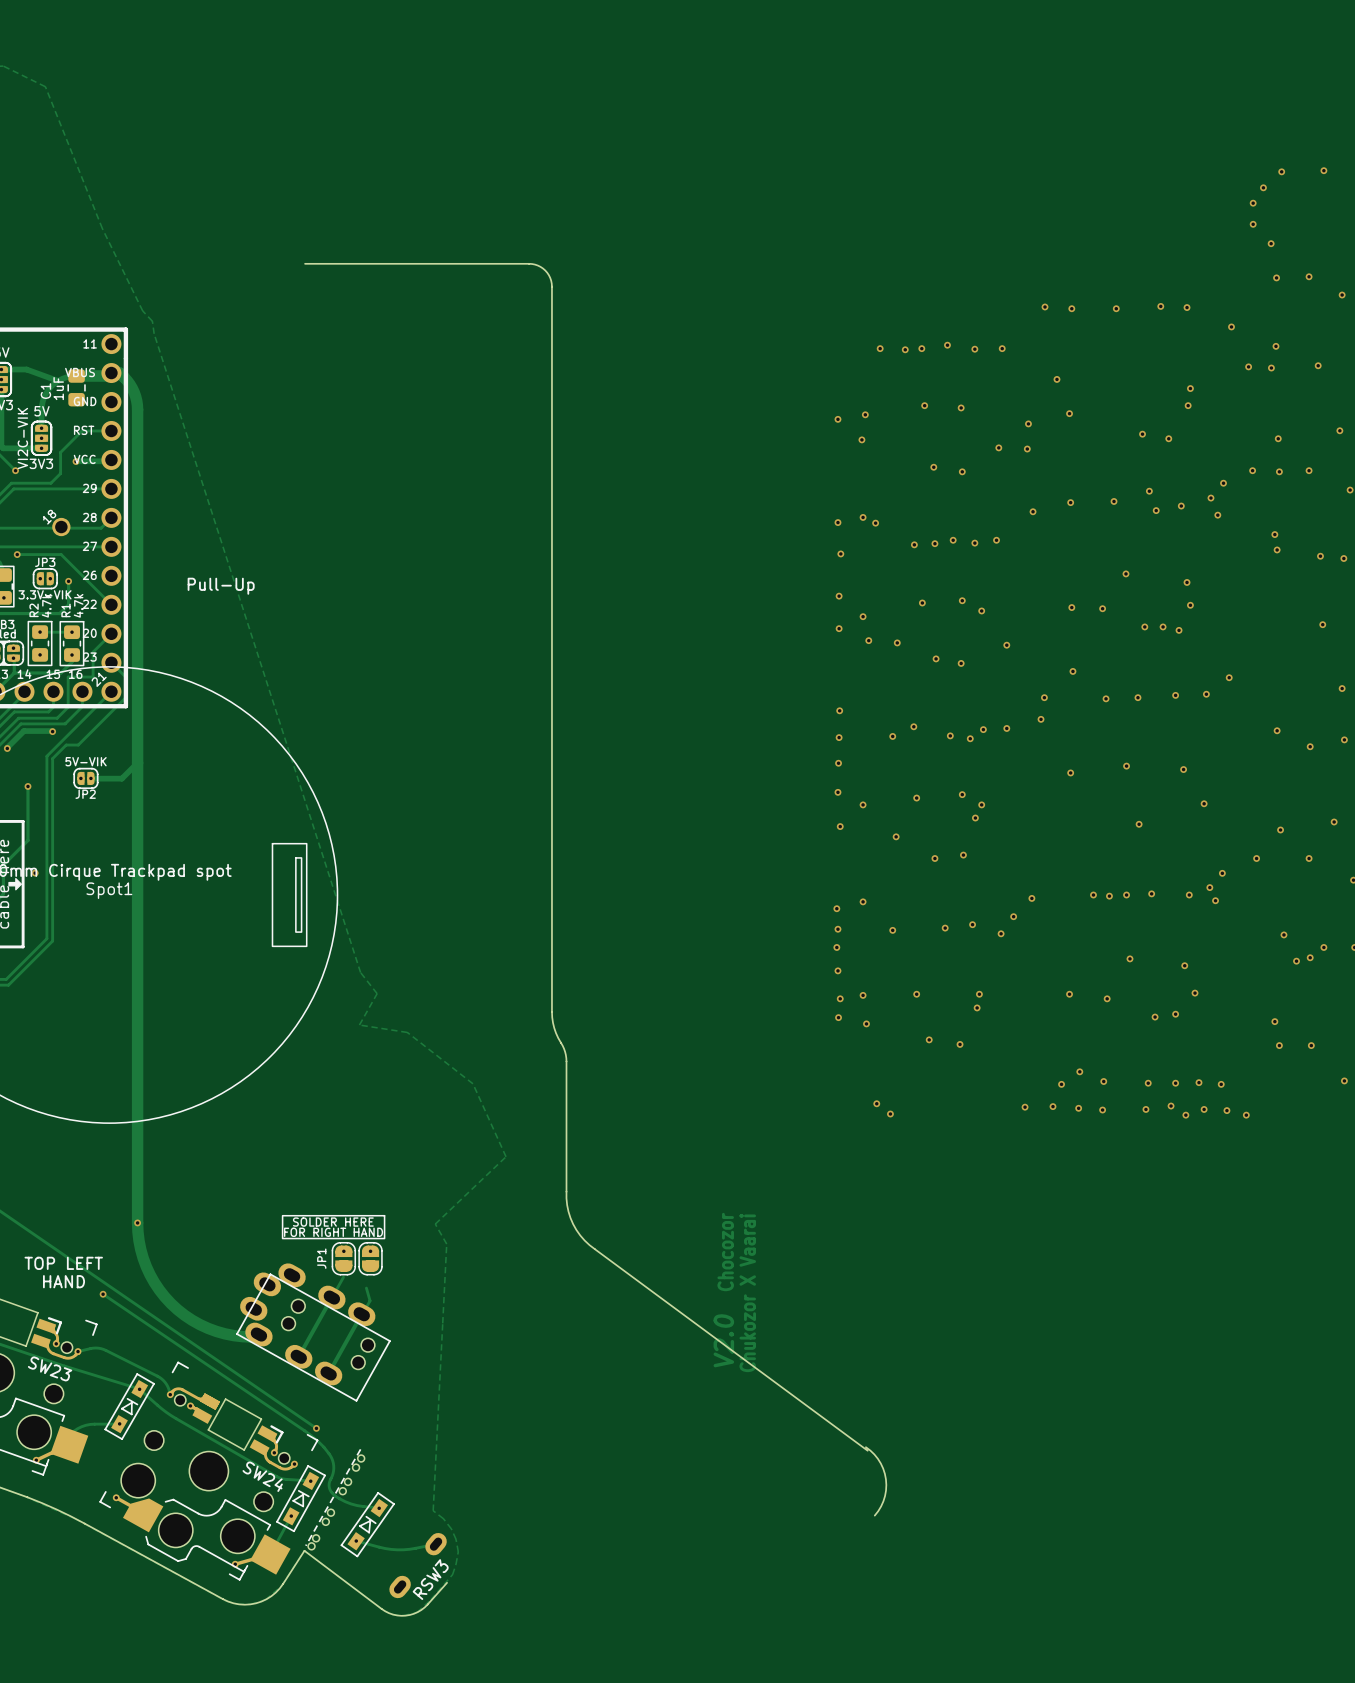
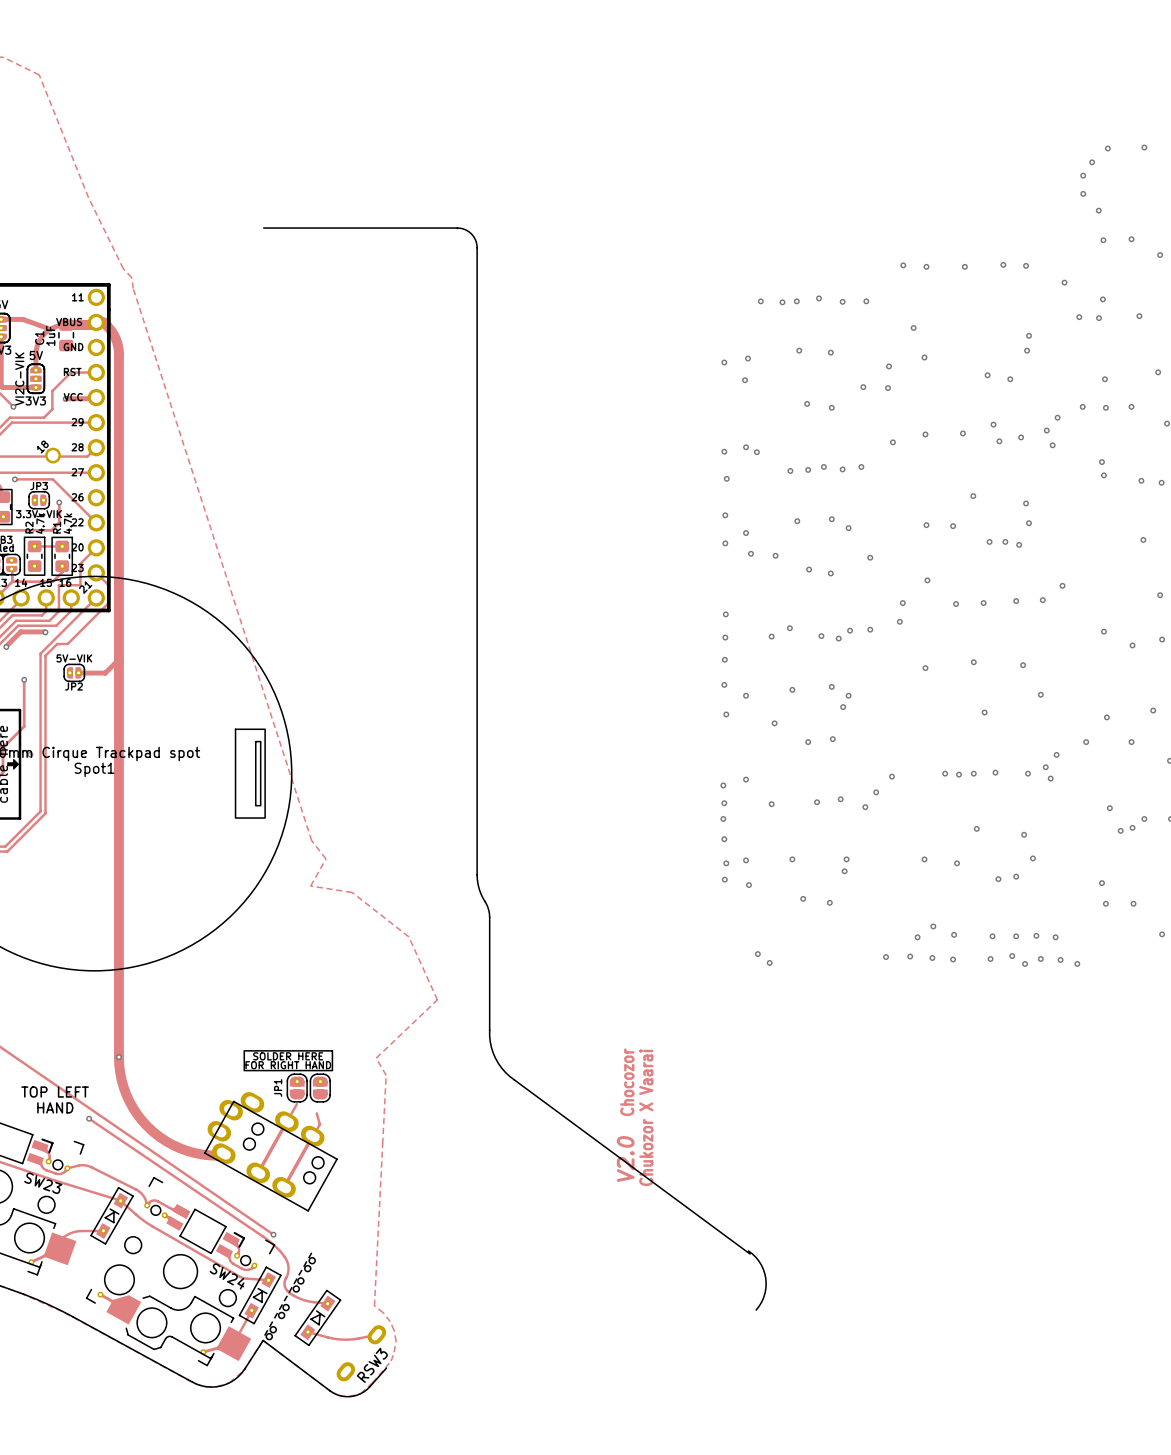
text: Pull-Up (221, 586) -> none

